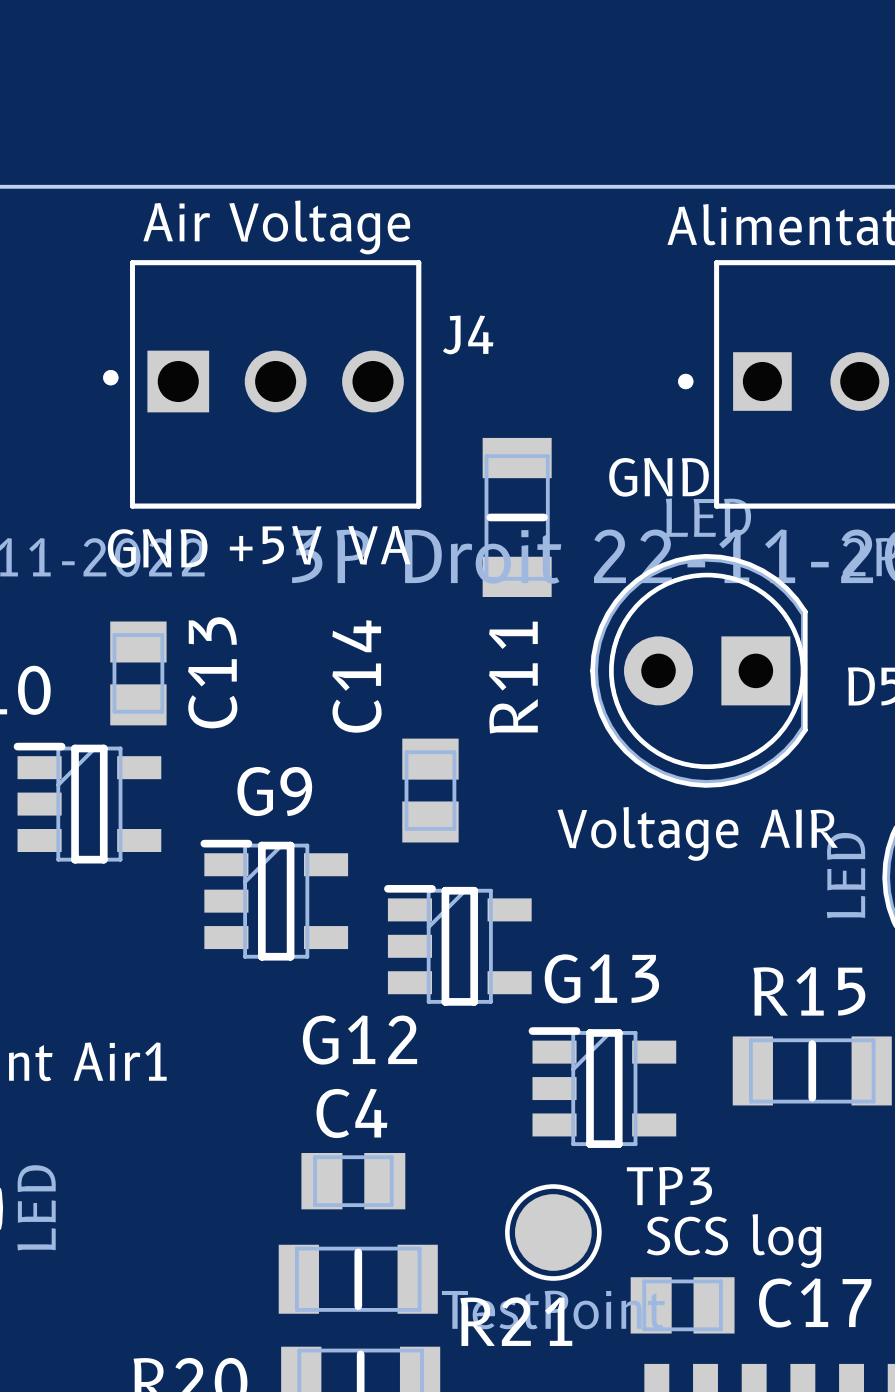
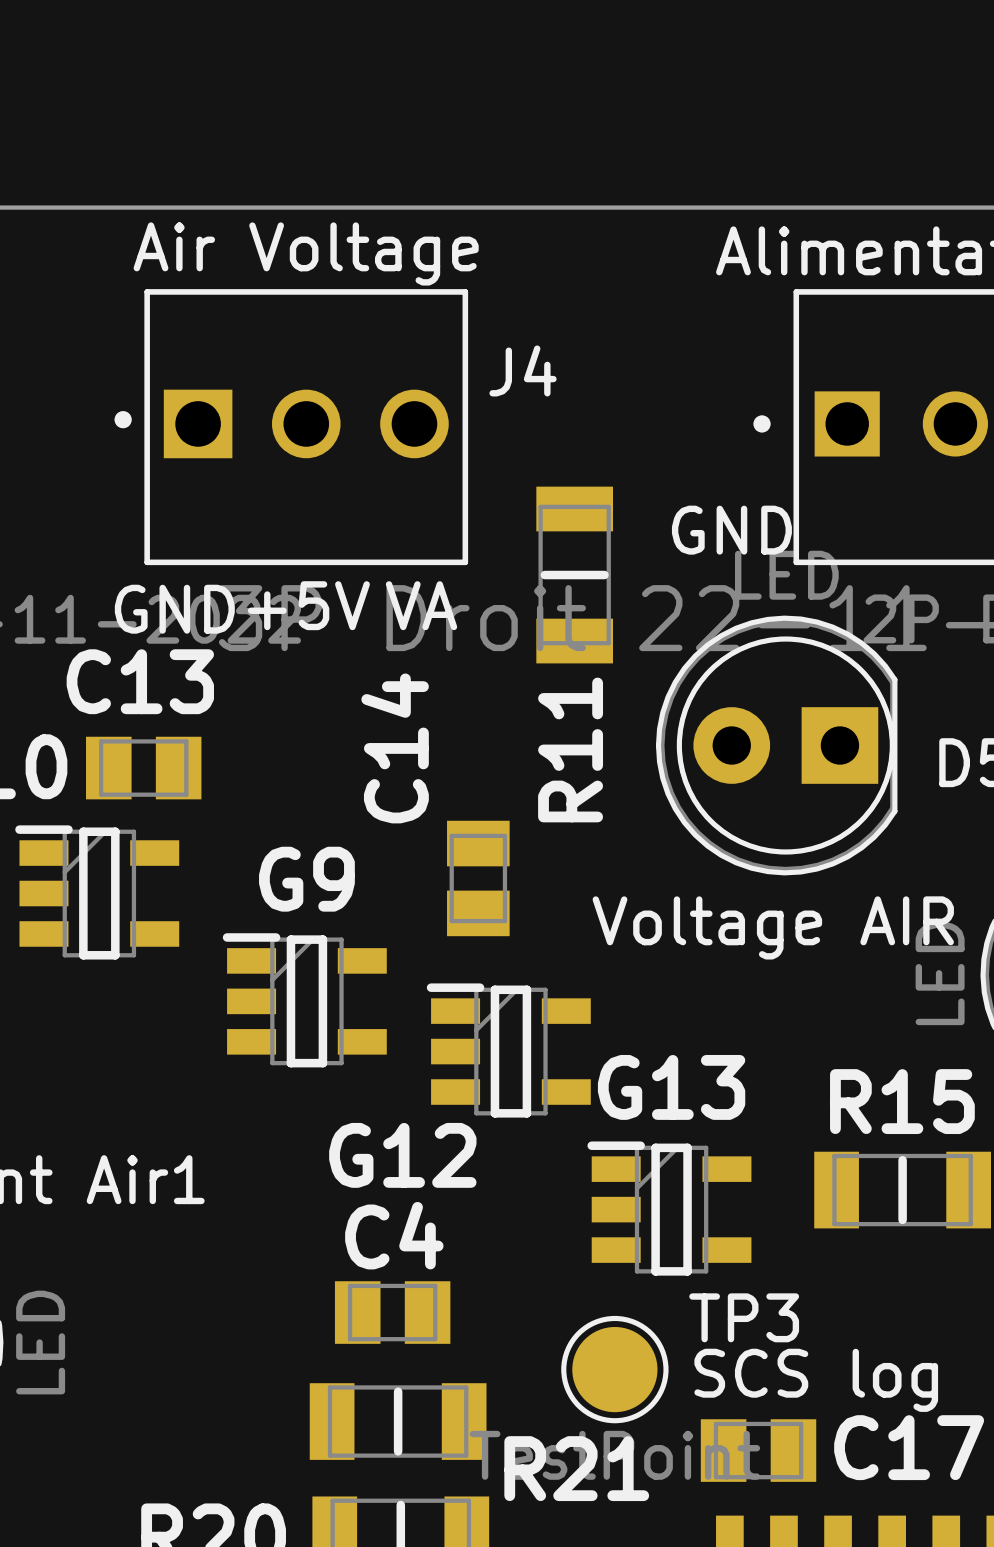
C13 name position: C13 (212, 672) -> C13 (140, 681)
C13 rotation: 0° (138, 673) -> 90° clockwise (143, 768)

